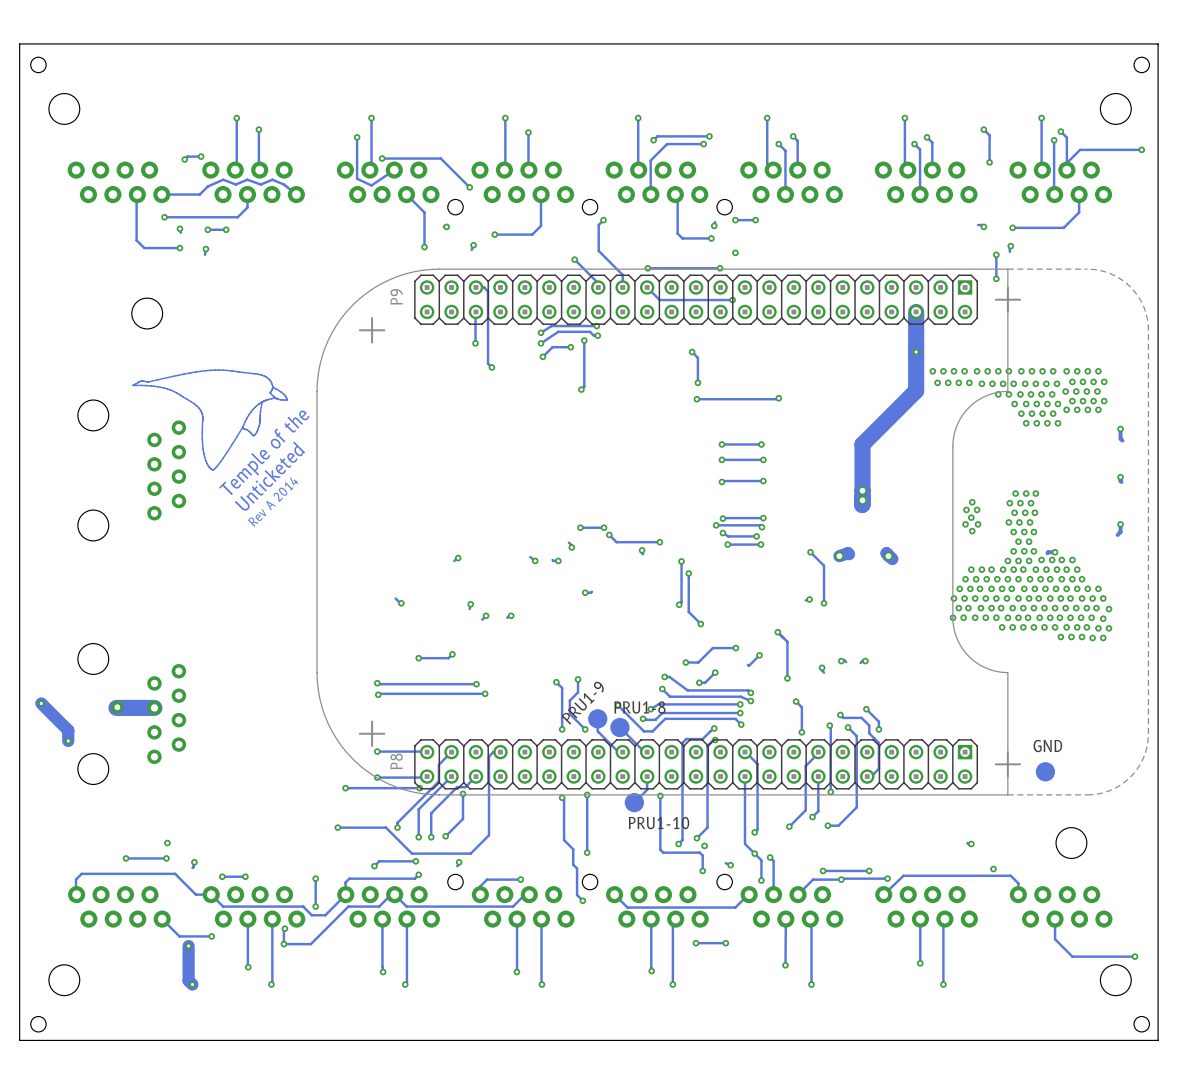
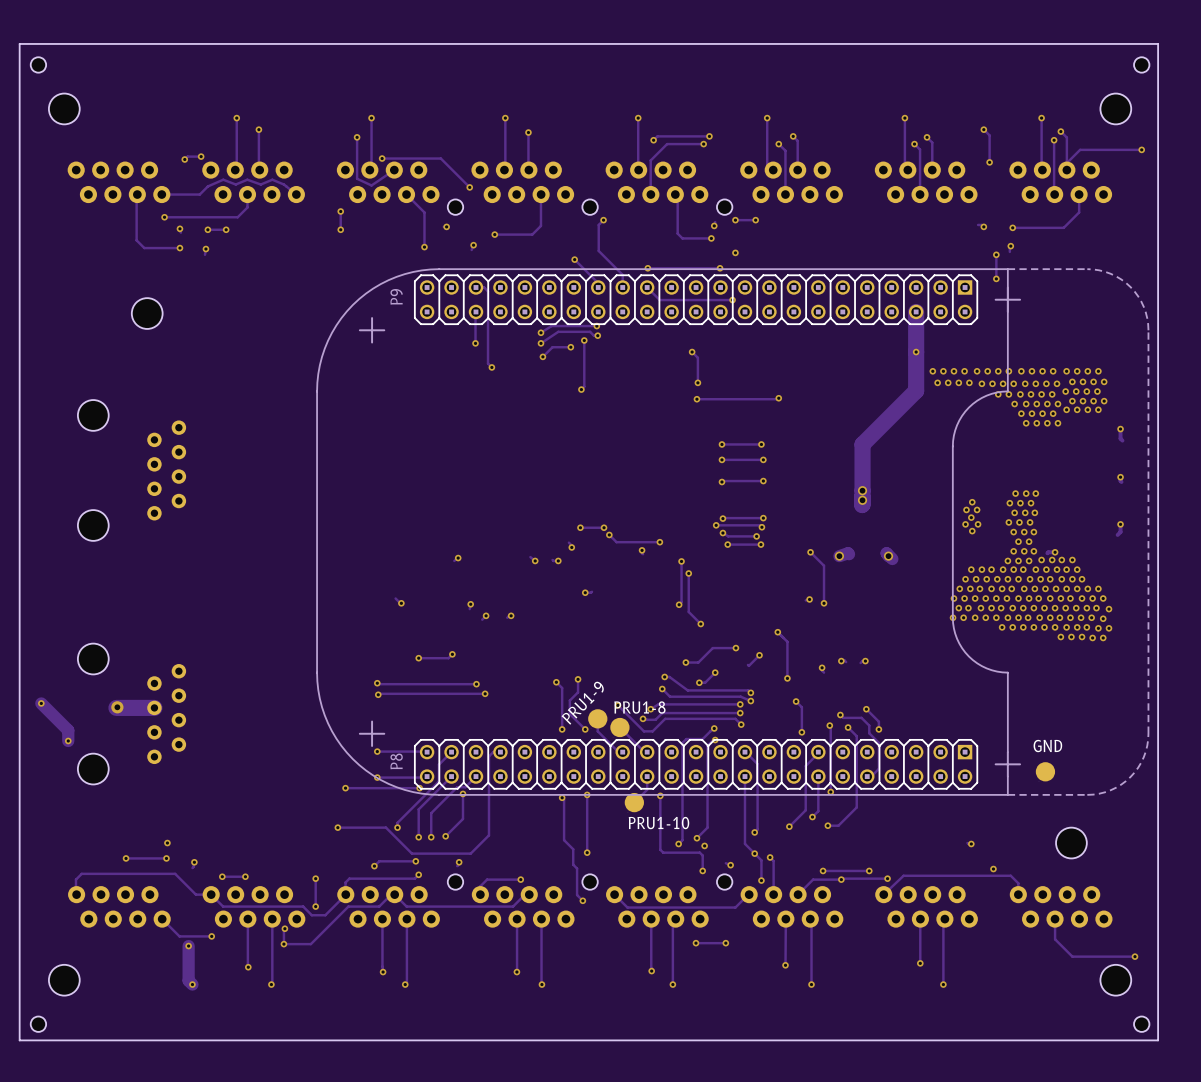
track: none -> (340, 211) (340, 229)
via: none -> (340, 211)
via: none -> (340, 229)
track: (272, 387) (269, 392) (276, 398) -> none
track: (266, 400) (275, 398) (286, 399) (283, 393) (272, 387) (270, 381) (265, 376) (231, 370) (195, 372) (148, 381) (140, 381) (132, 385) (167, 389) (198, 407) (202, 416) (203, 453) (207, 465) (212, 469) -> none
track: (266, 400) (262, 402) (259, 426) (253, 435) -> none
track: (266, 400) (253, 409) (242, 427) -> none
track: (252, 435) (243, 426) (223, 458) (213, 469) -> none
text: Temple of the (264, 452) -> none
text: Unticketed (270, 476) -> none
text: Rev A 2014 (273, 502) -> none

